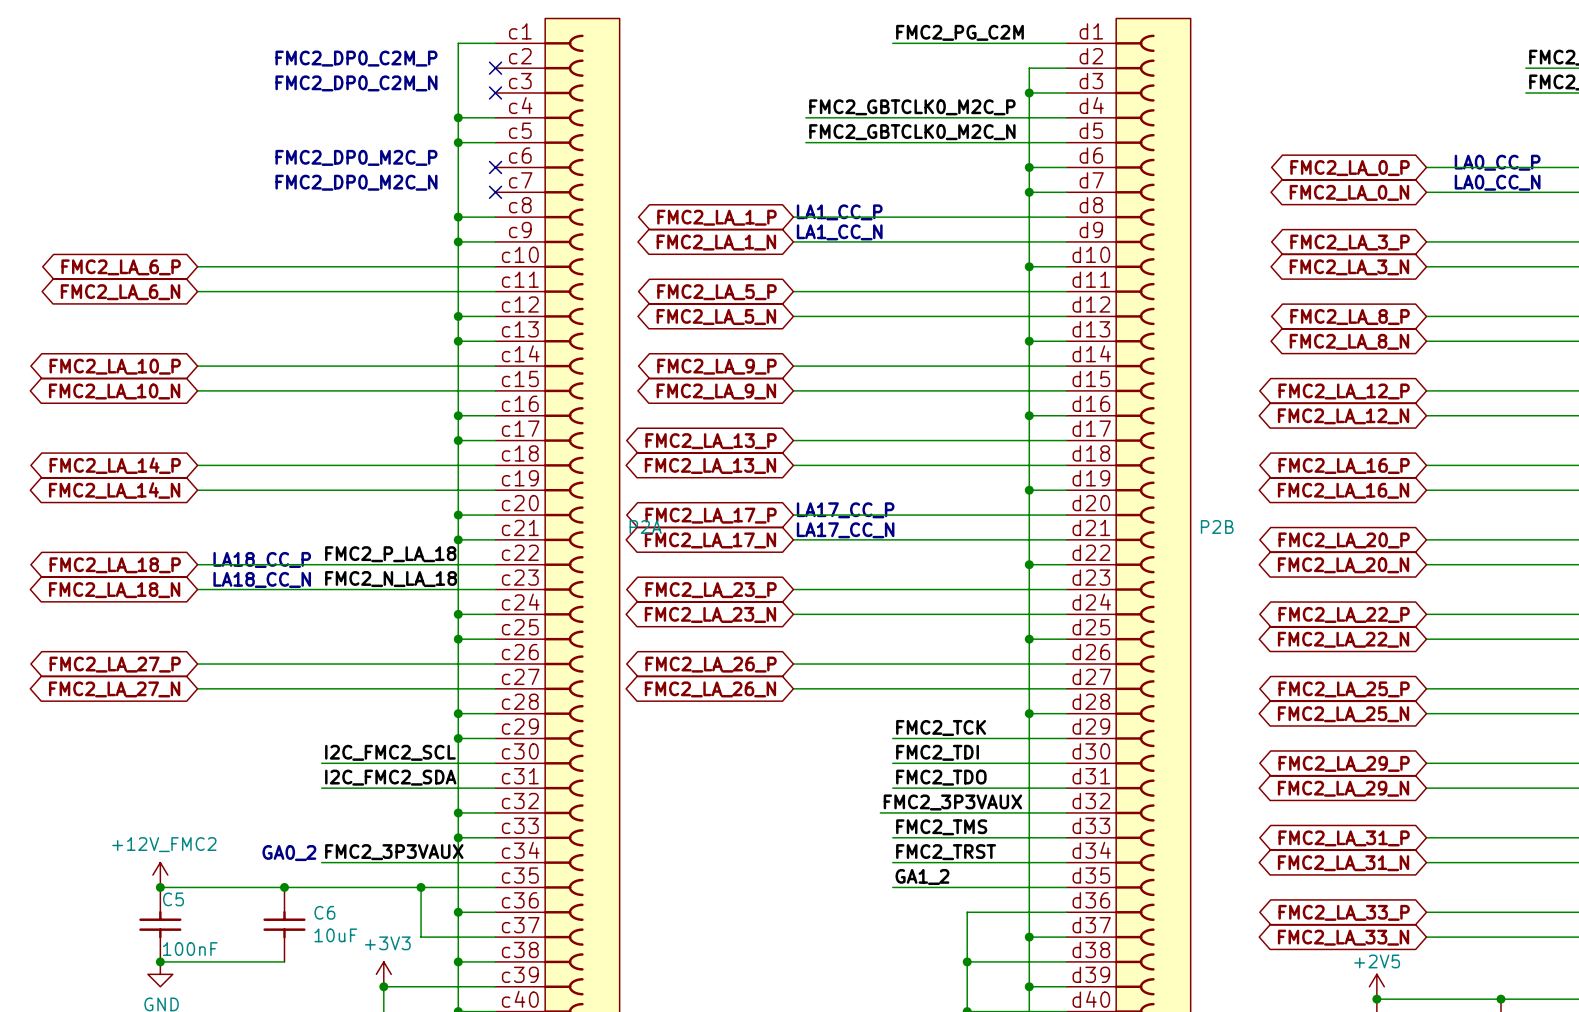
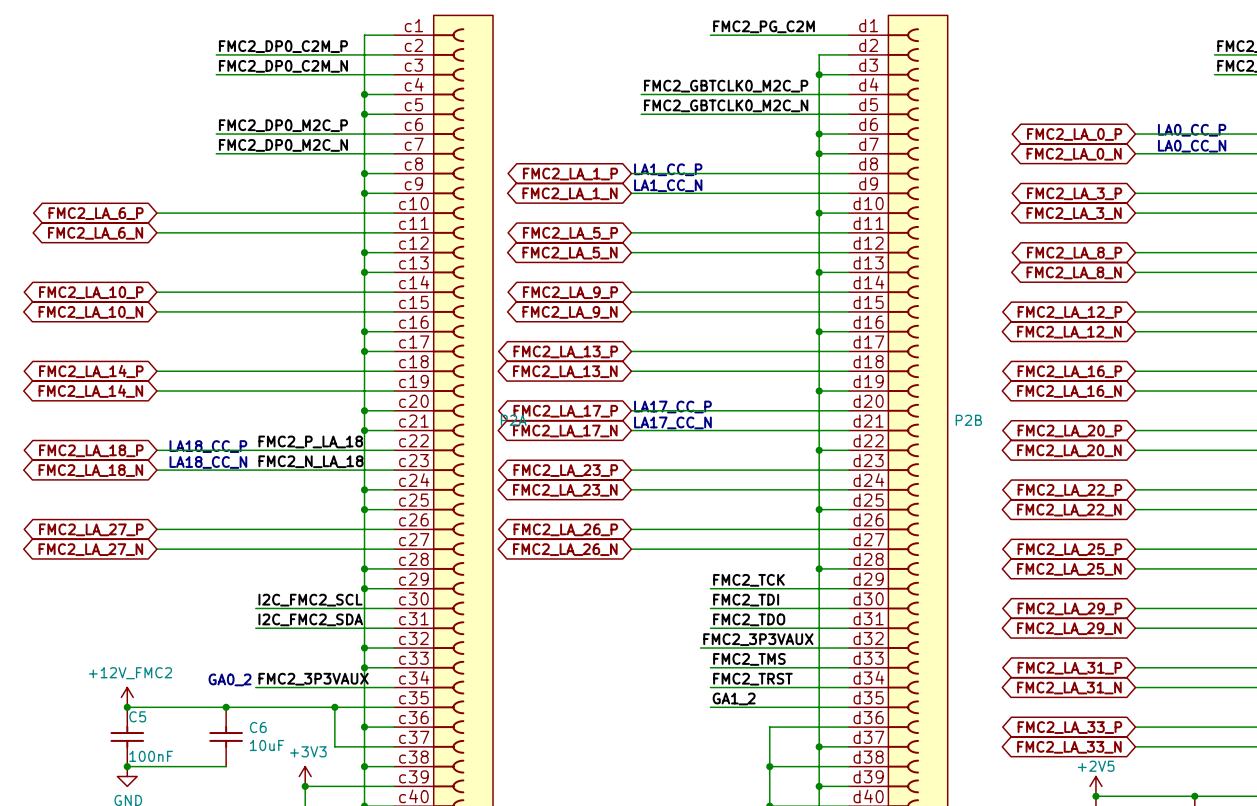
label: none -> FMC2_DP0_C2M_P (283, 46)
text: FMC2_DP0_C2M_P (356, 58) -> none
wire: none -> (216, 54) (394, 54)
no-connect mark: (495, 68) -> none
label: none -> FMC2_DP0_C2M_N (283, 66)
text: FMC2_DP0_C2M_N (356, 83) -> none
wire: none -> (216, 74) (394, 74)
no-connect mark: (495, 92) -> none
label: none -> FMC2_DP0_M2C_P (283, 125)
text: FMC2_DP0_M2C_P (356, 157) -> none
wire: none -> (216, 134) (394, 134)
no-connect mark: (495, 167) -> none
label: none -> FMC2_DP0_M2C_N (283, 145)
text: FMC2_DP0_M2C_N (356, 182) -> none
wire: none -> (216, 153) (394, 153)
no-connect mark: (495, 192) -> none

